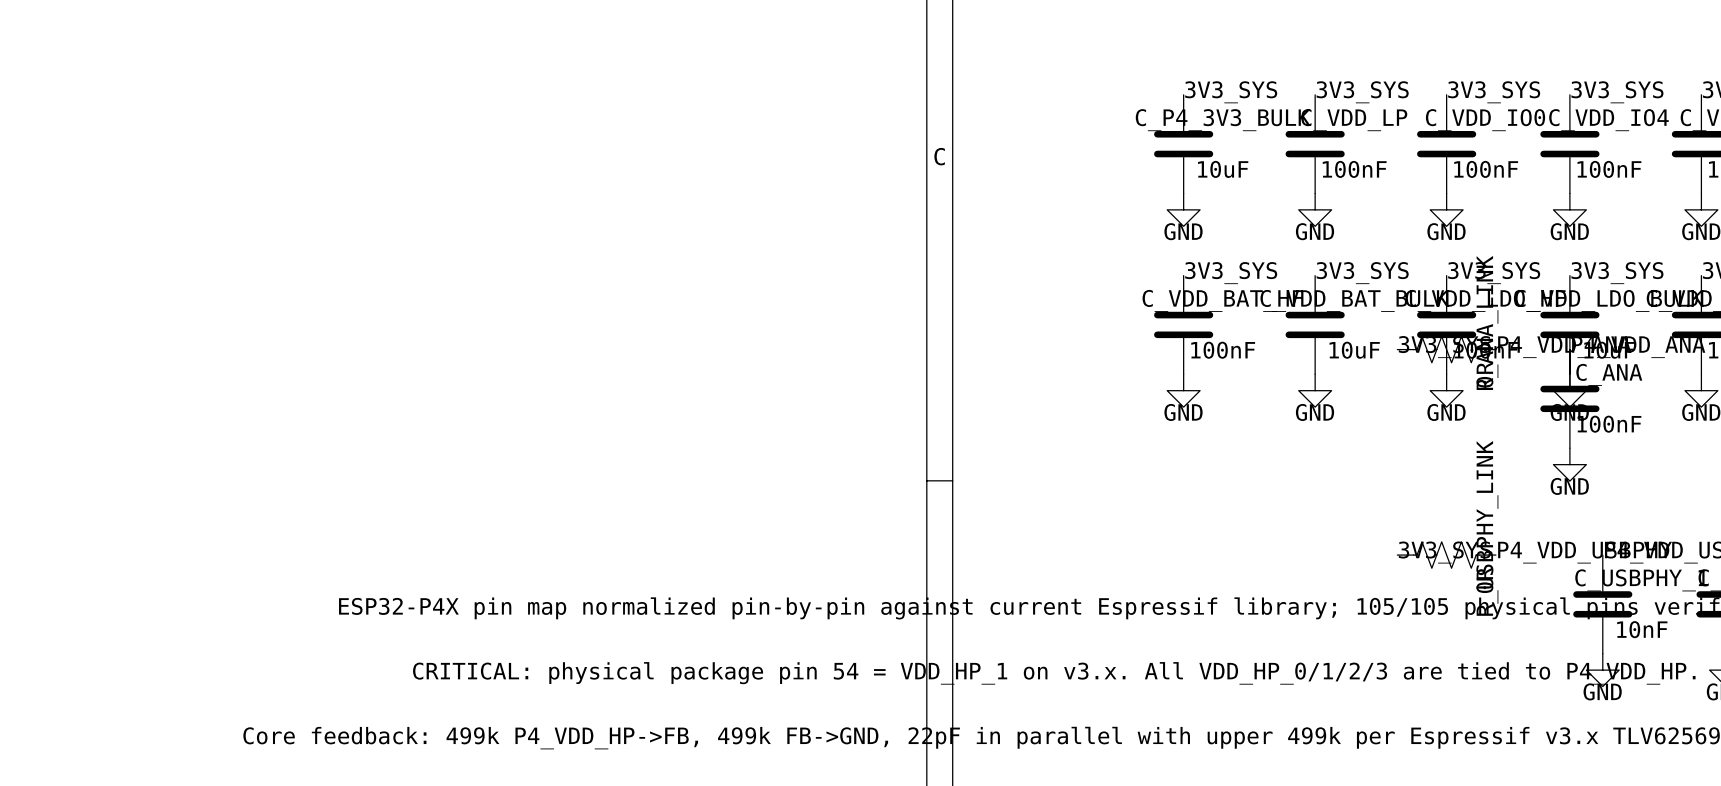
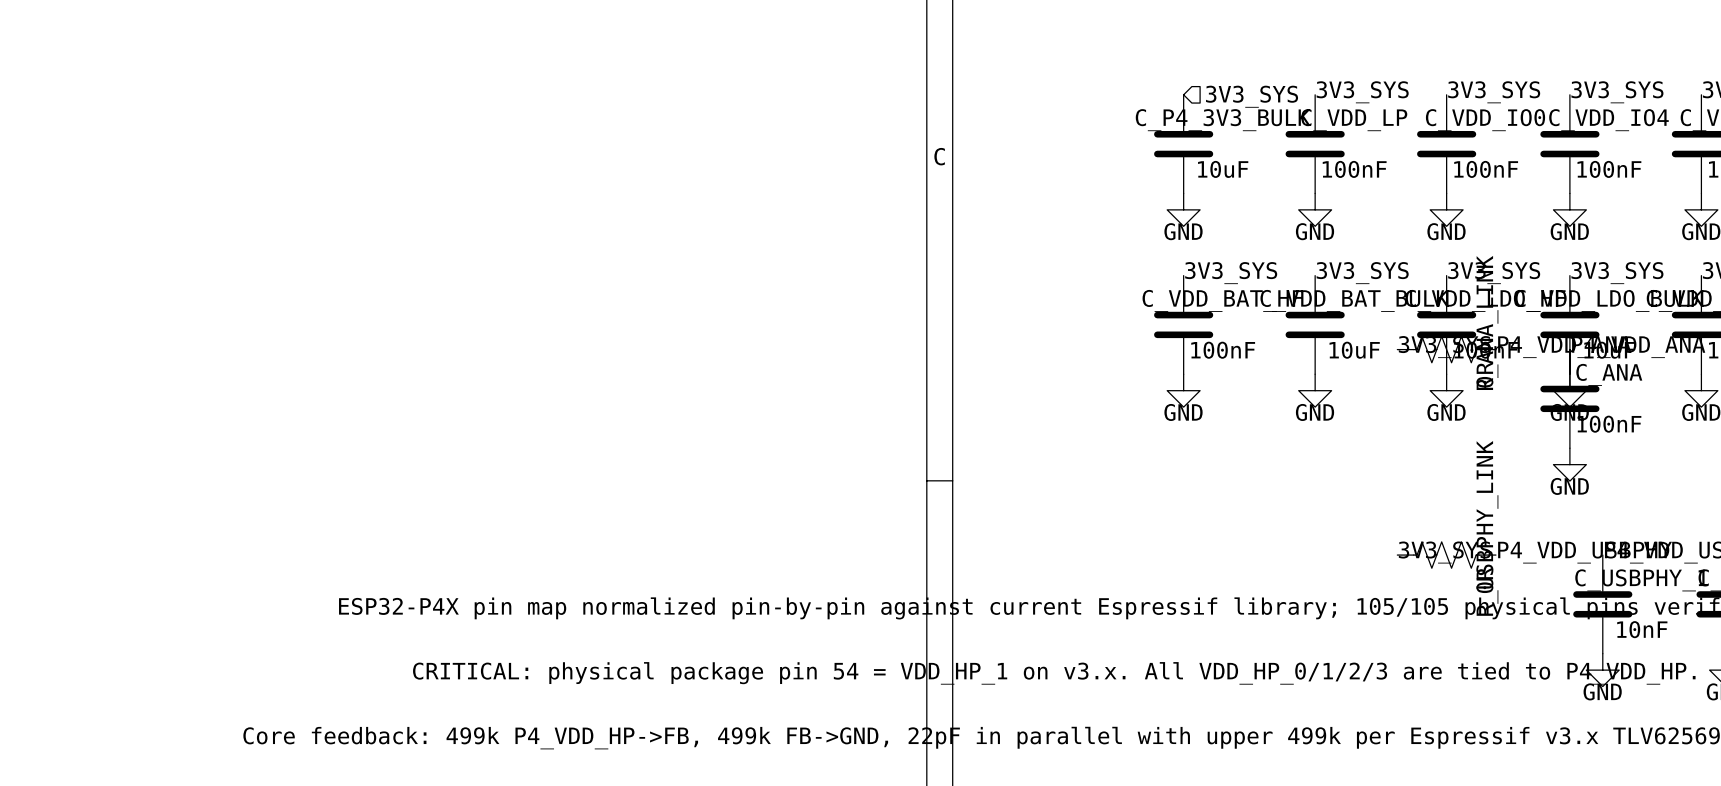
label: 3V3_SYS (1231, 92) -> none
hierarchical label: none -> 3V3_SYS (1252, 96)

